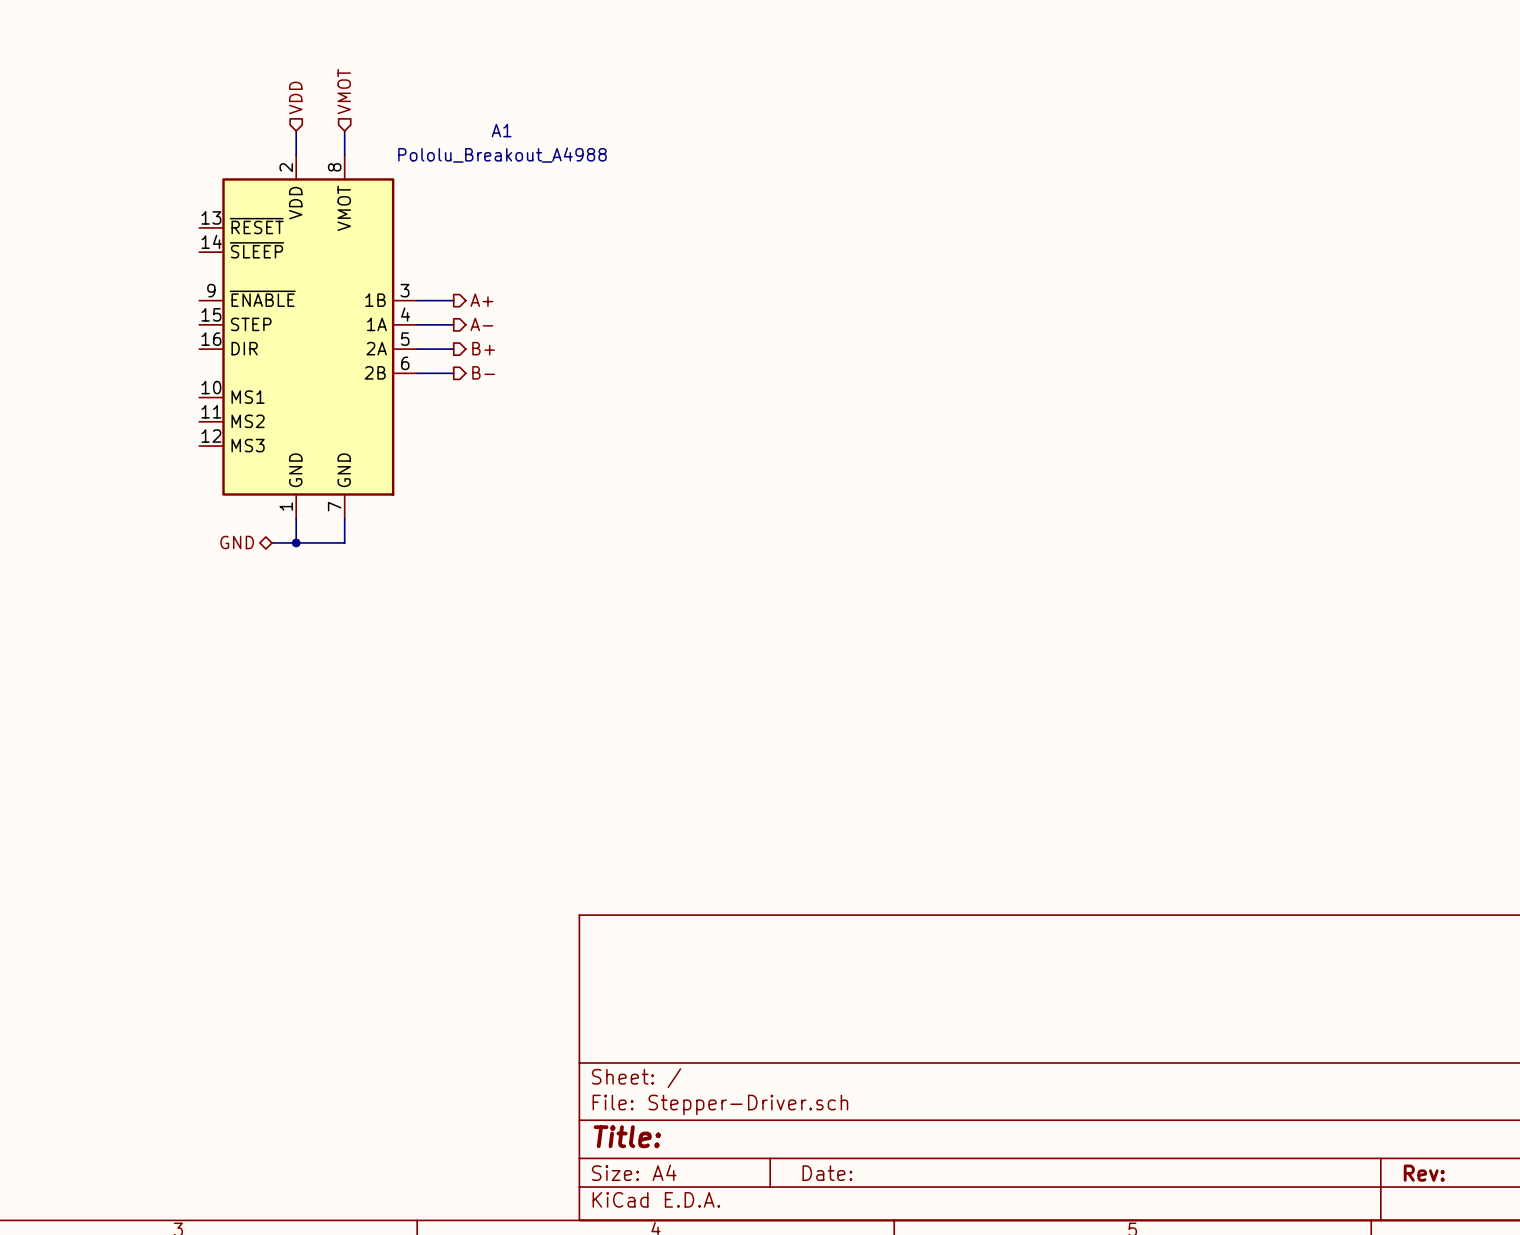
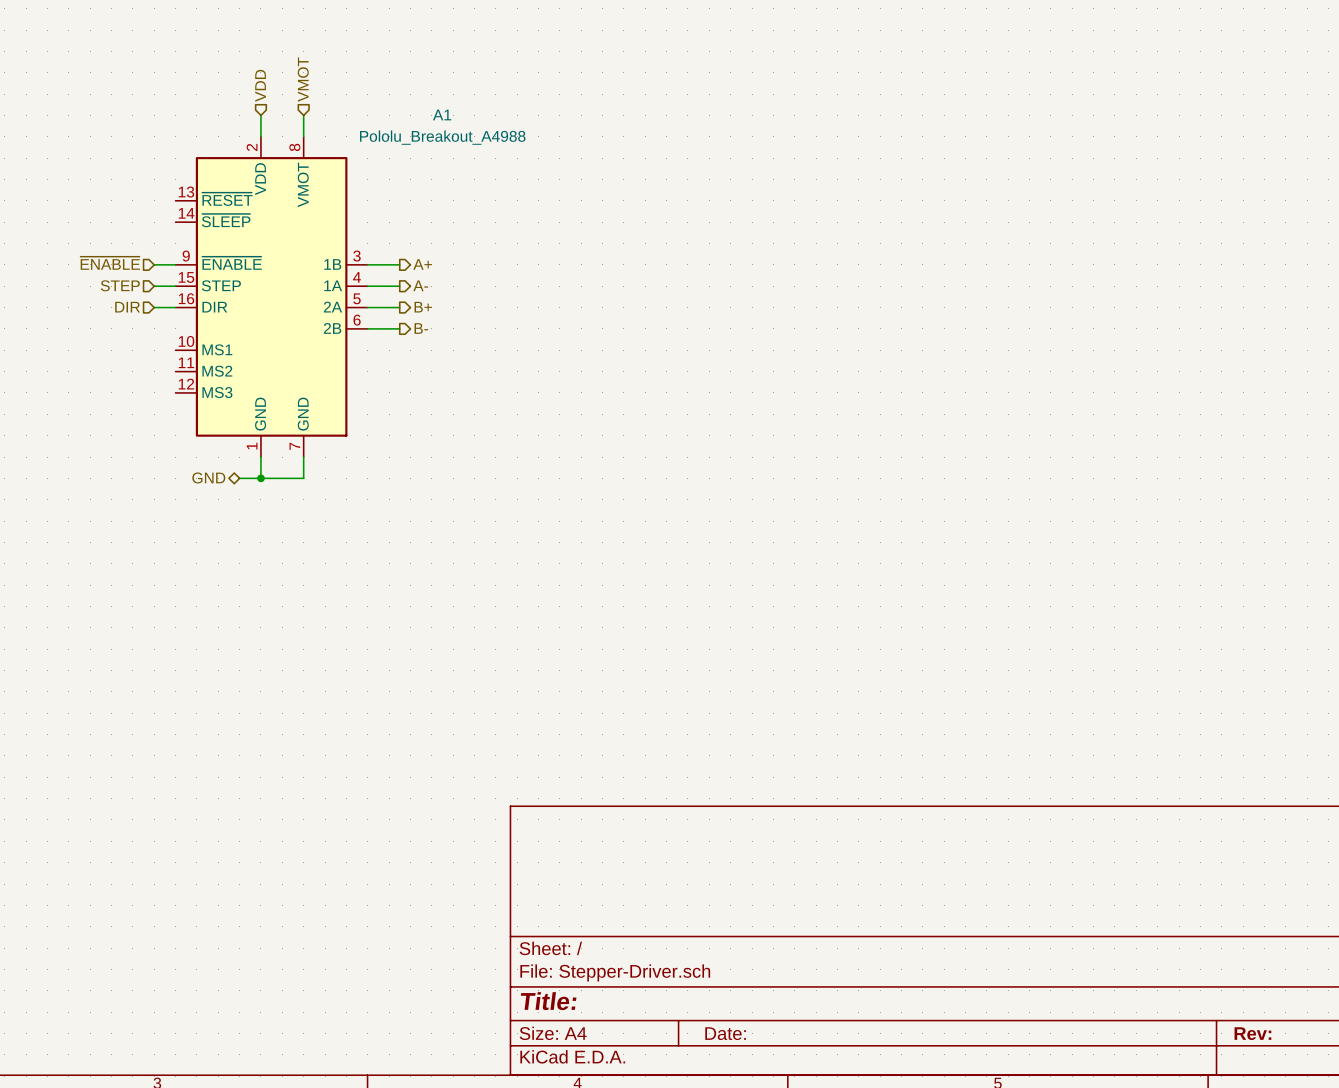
hierarchical label: none -> ~{ENABLE} (110, 263)
wire: none -> (154, 264) (175, 264)
hierarchical label: none -> STEP (120, 285)
wire: none -> (154, 286) (175, 286)
hierarchical label: none -> DIR (127, 307)
wire: none -> (154, 307) (175, 307)

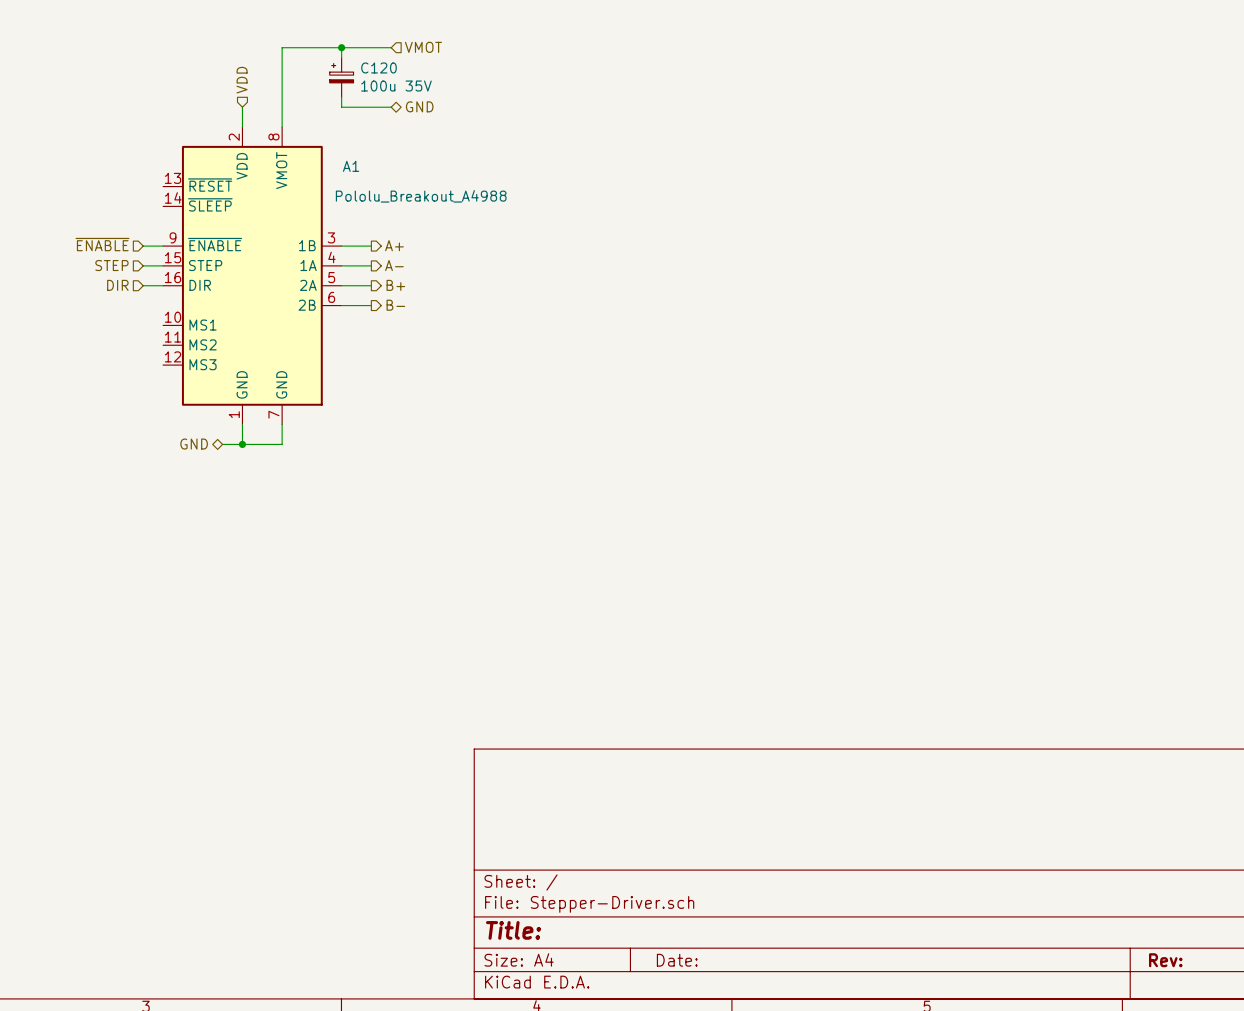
wire: none -> (341, 47) (341, 57)
junction: none -> (341, 47)
wire: none -> (391, 47) (282, 47) (282, 107)
hierarchical label rotation: 0° (303, 79) -> 90° clockwise (423, 47)
hierarchical label position: VMOT (303, 79) -> VMOT (423, 47)
C120: none -> 100u 35V (341, 77)
wire: none -> (341, 97) (341, 107) (391, 107)
A1 name position: A1 (442, 115) -> A1 (351, 166)
hierarchical label: none -> GND (419, 106)
A1 value position: Pololu_Breakout_A4988 (442, 137) -> Pololu_Breakout_A4988 (421, 196)

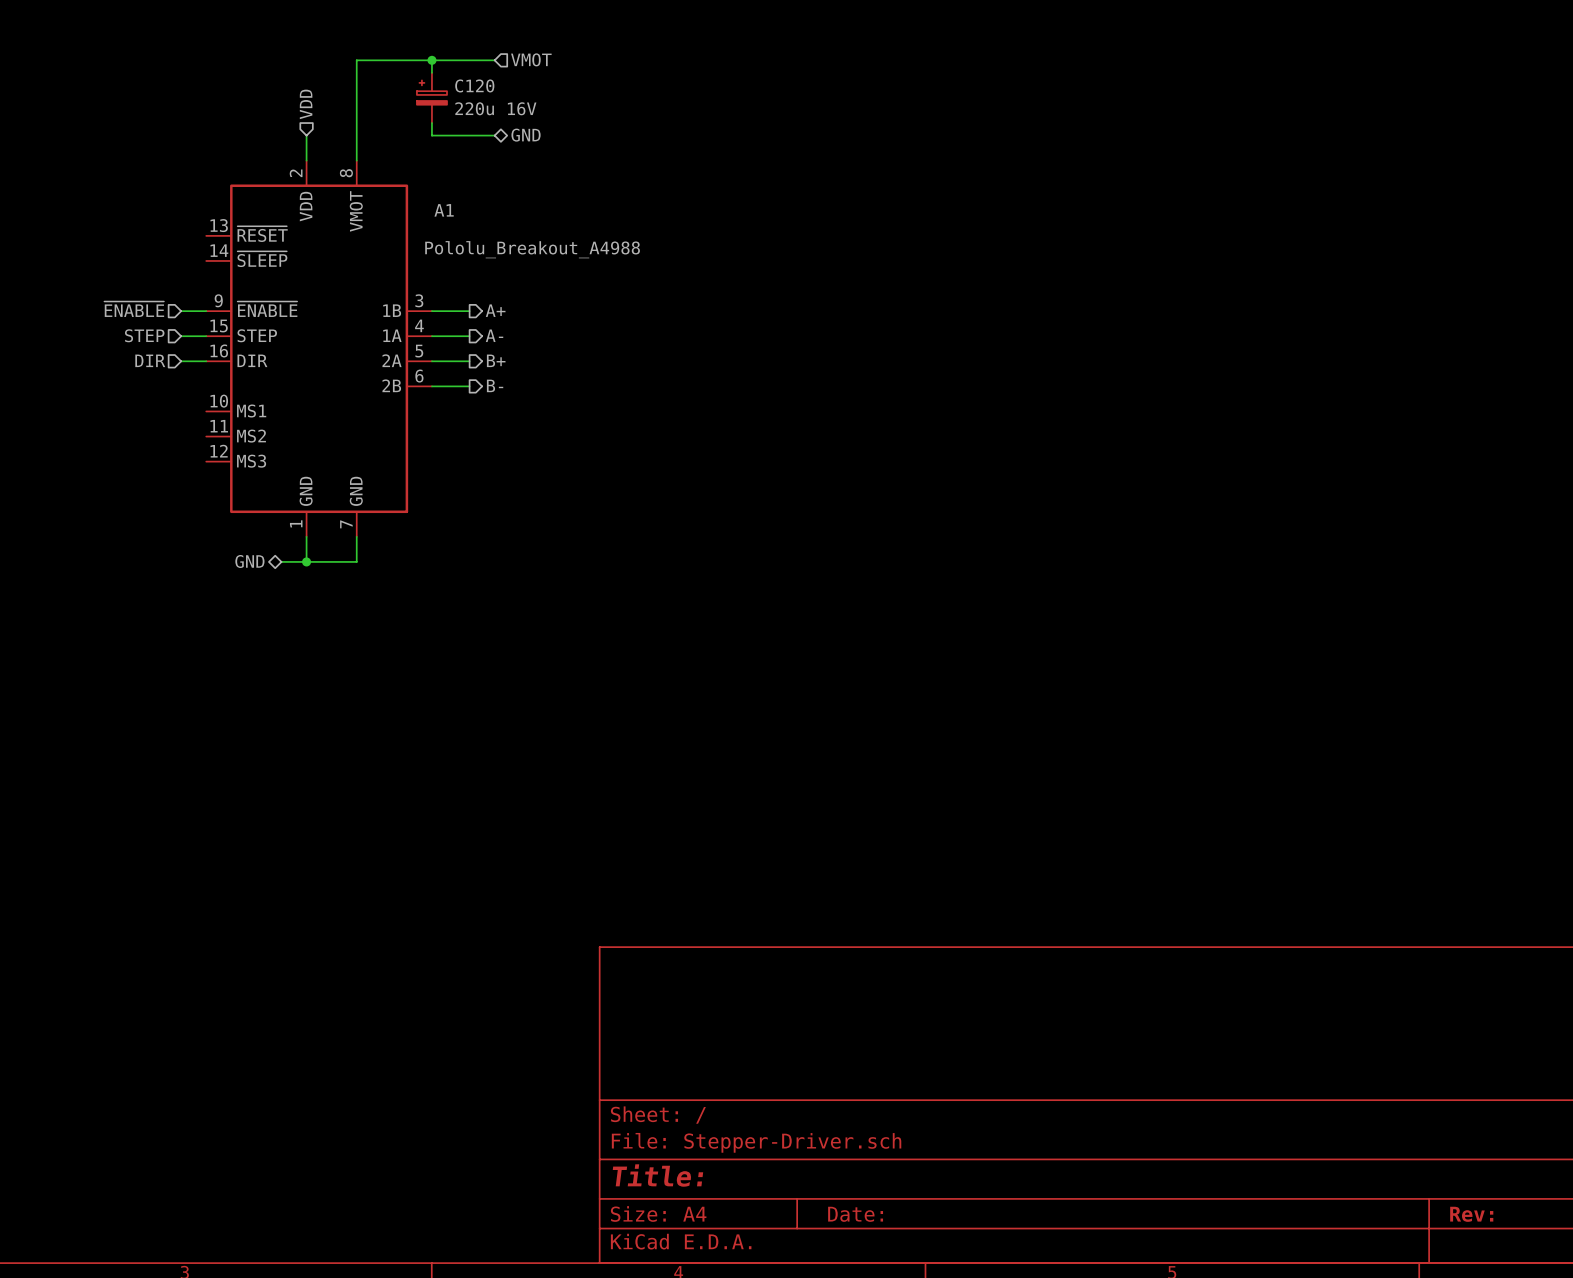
C120 value: 100u 35V (396, 86) -> 220u 16V (495, 108)

